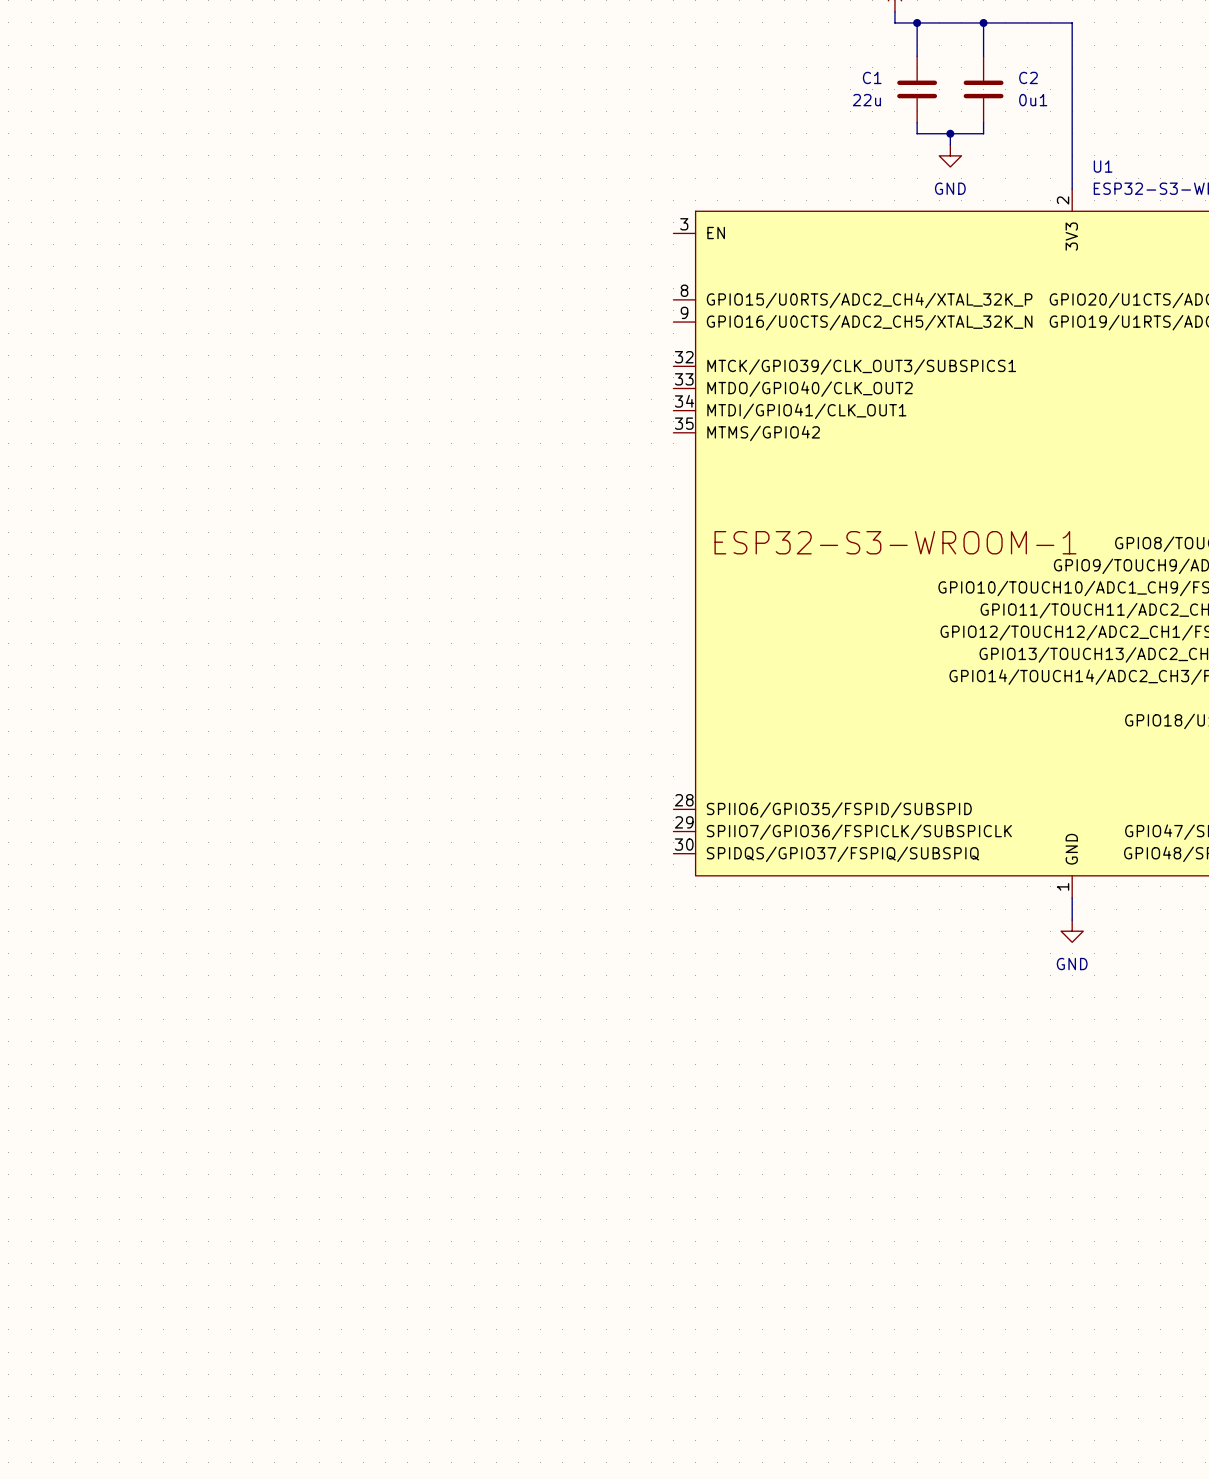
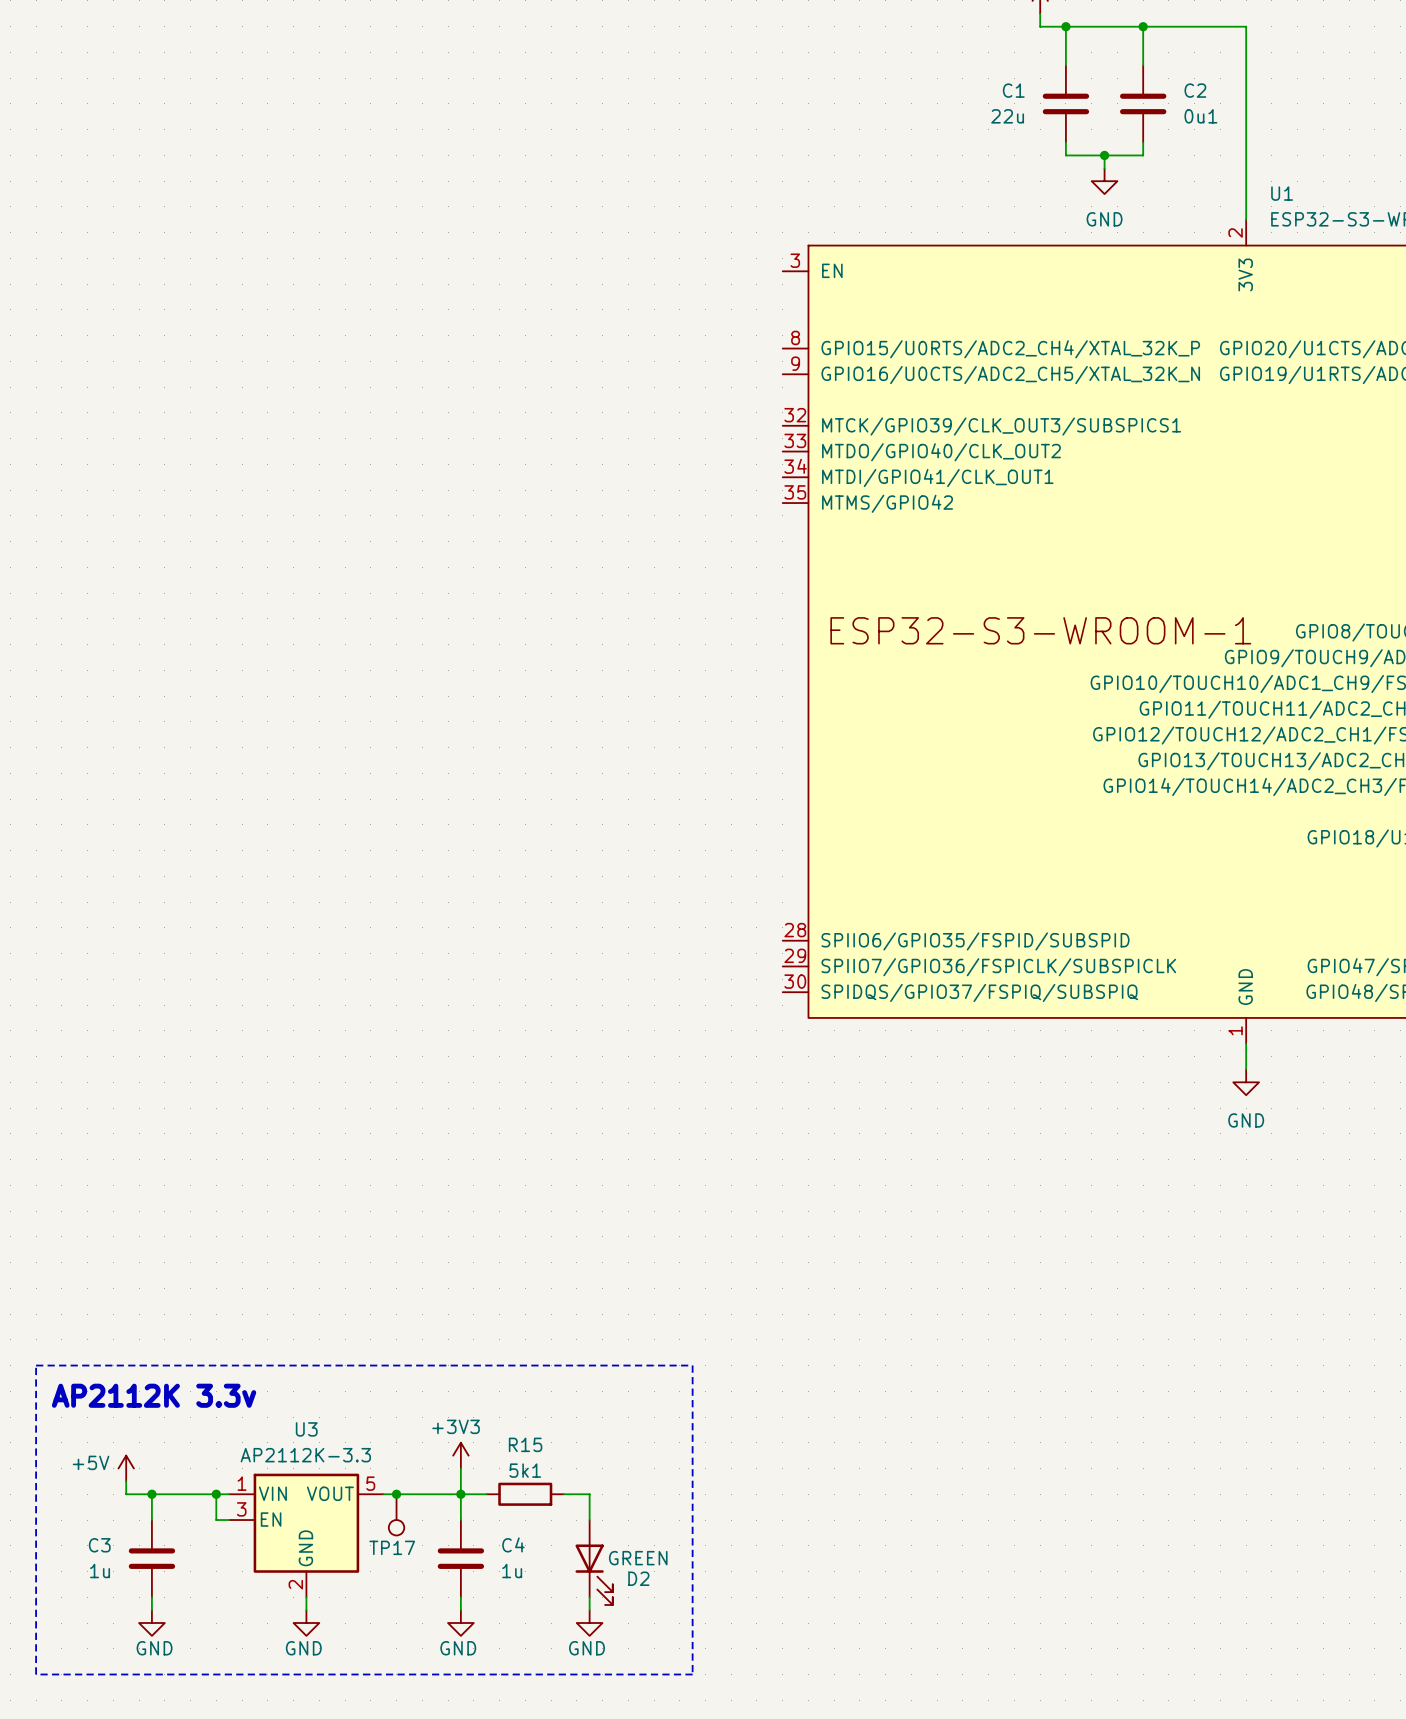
line: none -> (36, 1365) (692, 1365) (692, 1674) (36, 1674) (36, 1365)
text: none -> AP2112K 3.3v (154, 1395)
power symbol: none -> +3V3 (460, 1455)
power symbol: none -> +5V (126, 1468)
wire: none -> (460, 1468) (460, 1520)
wire: none -> (126, 1481) (126, 1494) (229, 1494)
wire: none -> (151, 1494) (151, 1520)
junction: none -> (151, 1494)
wire: none -> (216, 1494) (216, 1520) (229, 1520)
junction: none -> (216, 1494)
wire: none -> (383, 1494) (486, 1494)
junction: none -> (396, 1494)
junction: none -> (460, 1494)
R15: none -> 5k1 (525, 1494)
wire: none -> (563, 1494) (589, 1494) (589, 1520)
TP17: none -> (396, 1514)
U3: none -> AP2112K-3.3 (306, 1535)
C3: none -> 1u (151, 1558)
C4: none -> 1u (460, 1558)
D2: none -> GREEN (594, 1562)
wire: none -> (151, 1597) (151, 1610)
wire: none -> (306, 1597) (306, 1610)
wire: none -> (460, 1597) (460, 1610)
wire: none -> (589, 1597) (589, 1610)
power symbol: none -> GND (151, 1623)
power symbol: none -> GND (306, 1623)
power symbol: none -> GND (460, 1623)
power symbol: none -> GND (589, 1623)

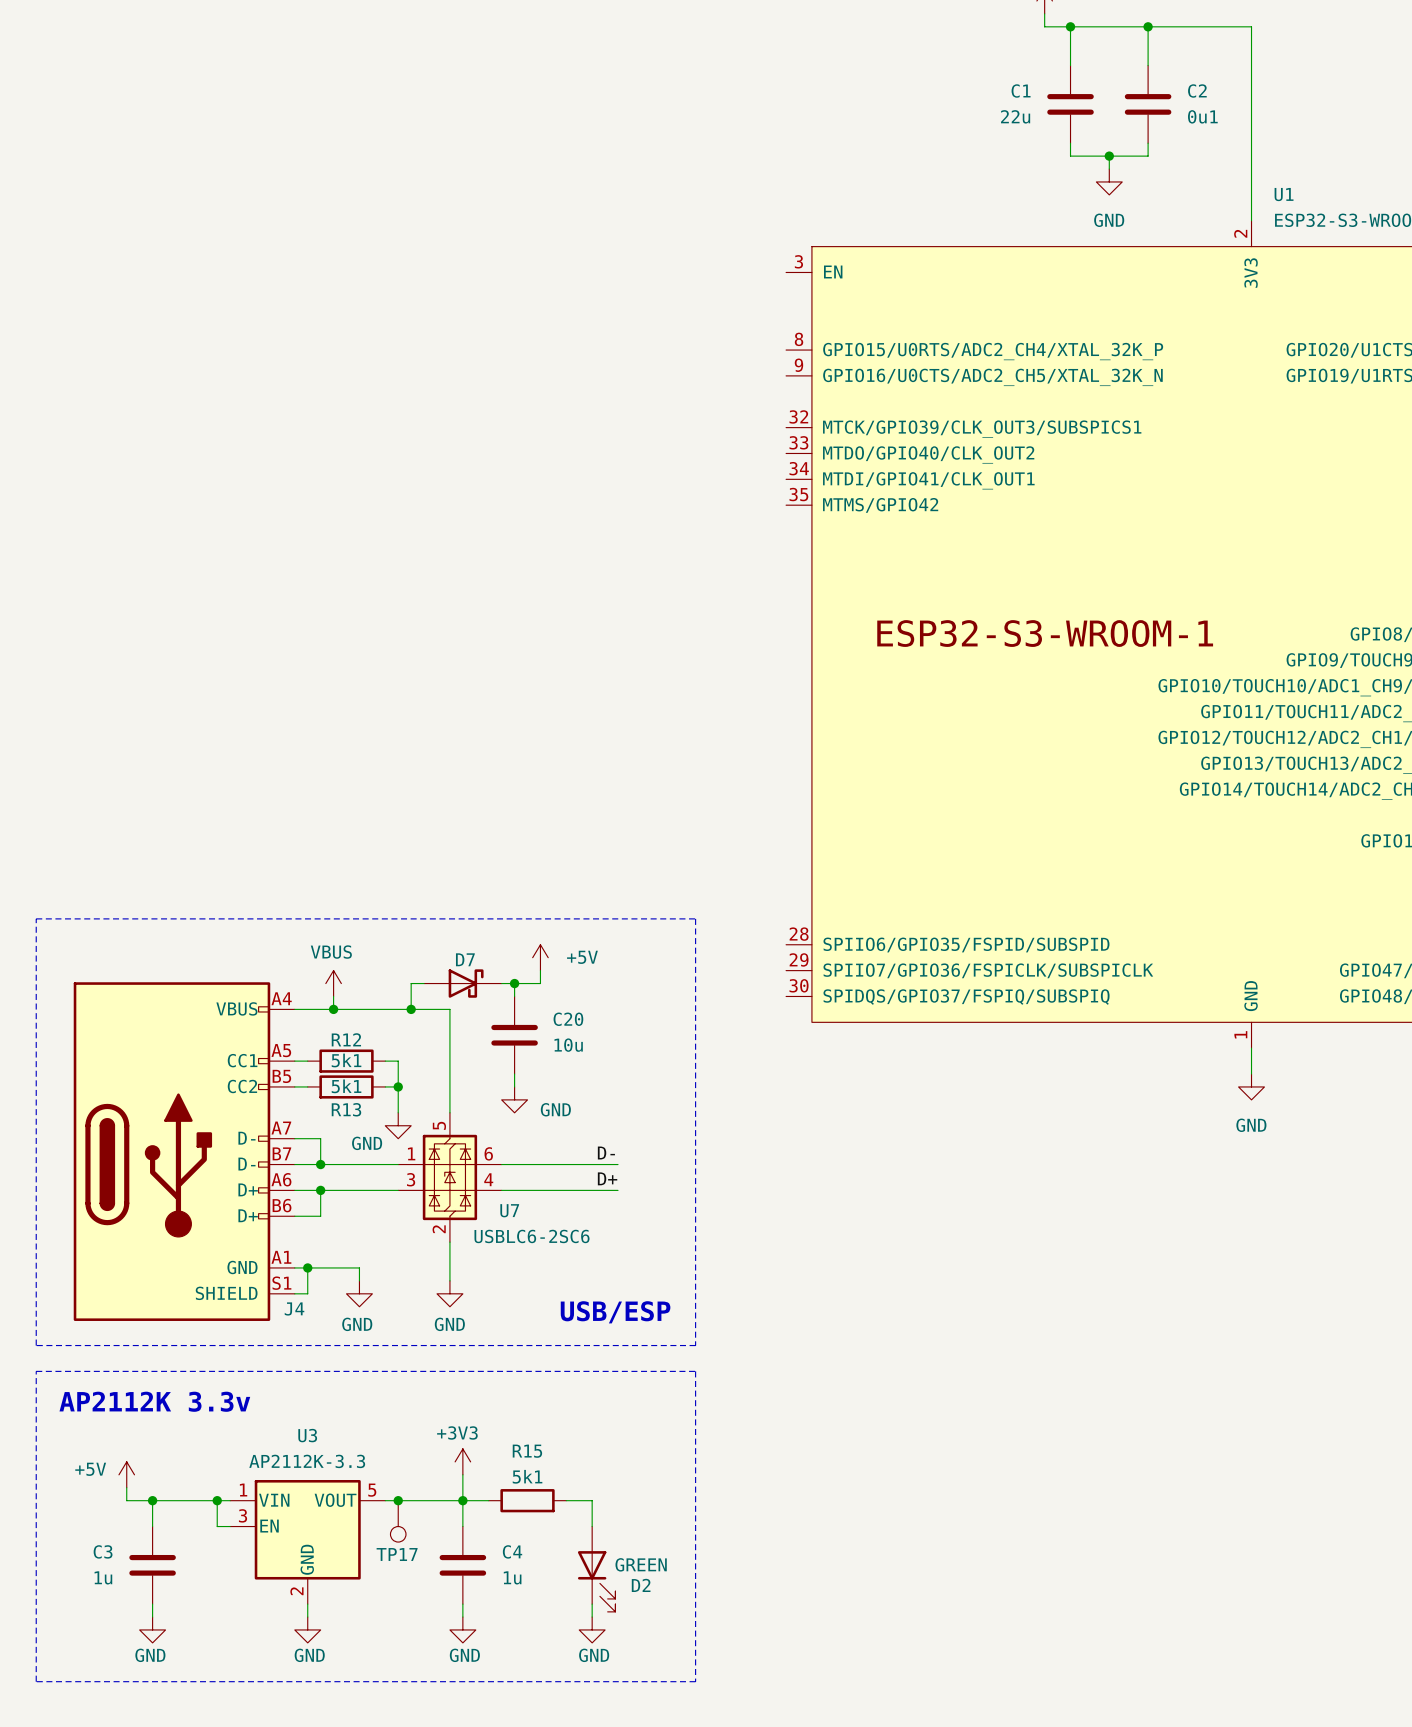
line: none -> (36, 918) (695, 918) (695, 1345) (36, 1345) (36, 918)
power symbol: none -> +5V (540, 957)
wire: none -> (540, 970) (540, 983) (501, 983)
power symbol: none -> VBUS (333, 983)
wire: none -> (424, 983) (411, 983) (411, 1009)
D7: none -> (462, 983)
wire: none -> (514, 983) (514, 996)
junction: none -> (514, 983)
wire: none -> (333, 996) (333, 1009)
wire: none -> (294, 1009) (449, 1009) (449, 1112)
junction: none -> (333, 1009)
junction: none -> (411, 1009)
C20: none -> 10u (514, 1035)
wire: none -> (294, 1061) (307, 1061)
R12: none -> 5k1 (346, 1061)
wire: none -> (385, 1061) (398, 1061) (398, 1112)
wire: none -> (514, 1074) (514, 1086)
wire: none -> (294, 1086) (307, 1086)
R13: none -> 5k1 (346, 1086)
wire: none -> (385, 1086) (398, 1086)
junction: none -> (398, 1086)
power symbol: none -> GND (514, 1099)
power symbol: none -> GND (398, 1125)
wire: none -> (294, 1138) (320, 1138) (320, 1164)
J4: none -> (184, 1151)
label: none -> D- (606, 1153)
wire: none -> (294, 1164) (398, 1164)
junction: none -> (320, 1164)
wire: none -> (501, 1164) (618, 1164)
U7: none -> USBLC6-2SC6 (449, 1177)
label: none -> D+ (607, 1178)
wire: none -> (294, 1190) (398, 1190)
wire: none -> (320, 1190) (320, 1216) (294, 1216)
junction: none -> (320, 1190)
wire: none -> (501, 1190) (618, 1190)
wire: none -> (449, 1242) (449, 1280)
wire: none -> (294, 1267) (359, 1267) (359, 1280)
wire: none -> (307, 1267) (307, 1293) (294, 1293)
junction: none -> (307, 1267)
power symbol: none -> GND (359, 1293)
power symbol: none -> GND (449, 1293)
text: none -> USB/ESP (615, 1312)

